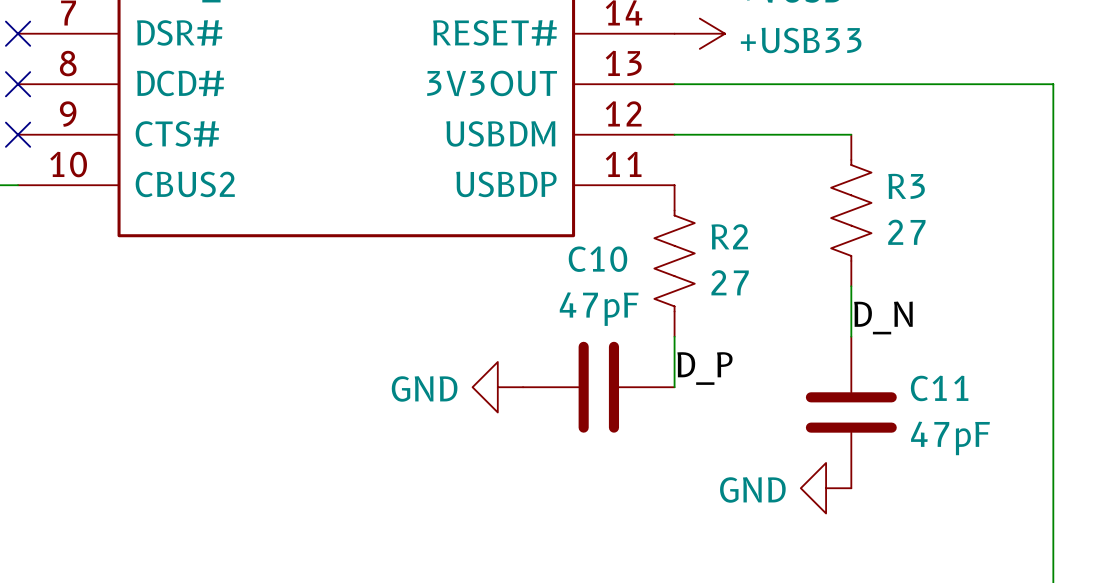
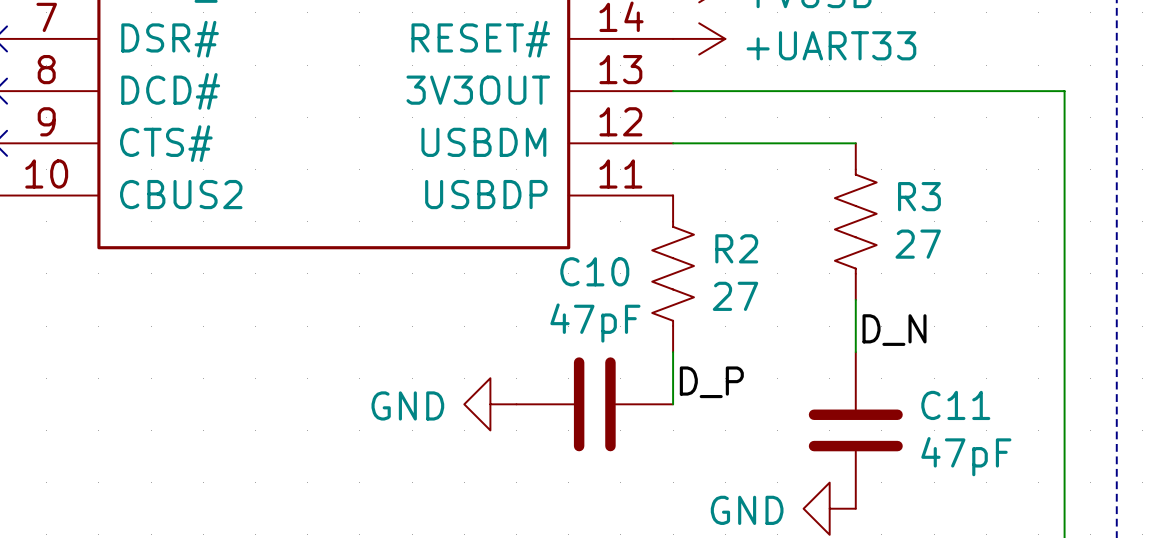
power symbol: +USB33 (699, 33) -> +UART33 (699, 38)

